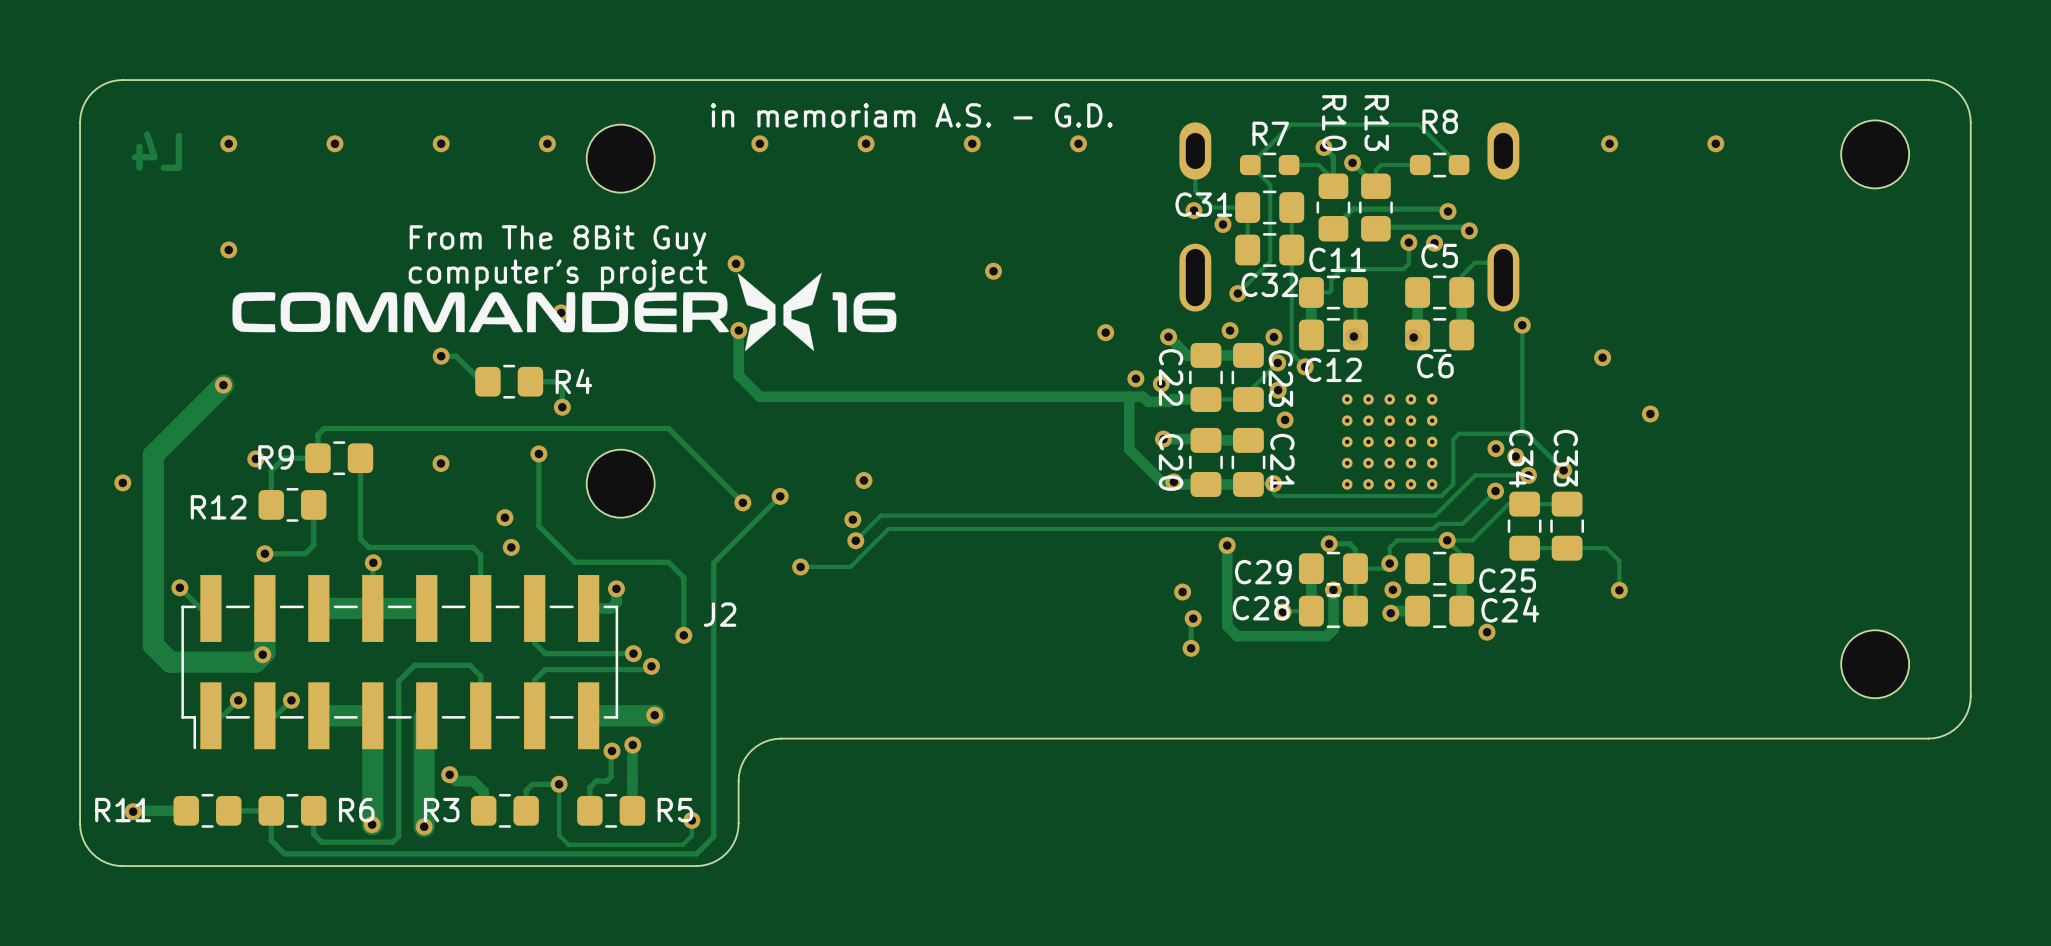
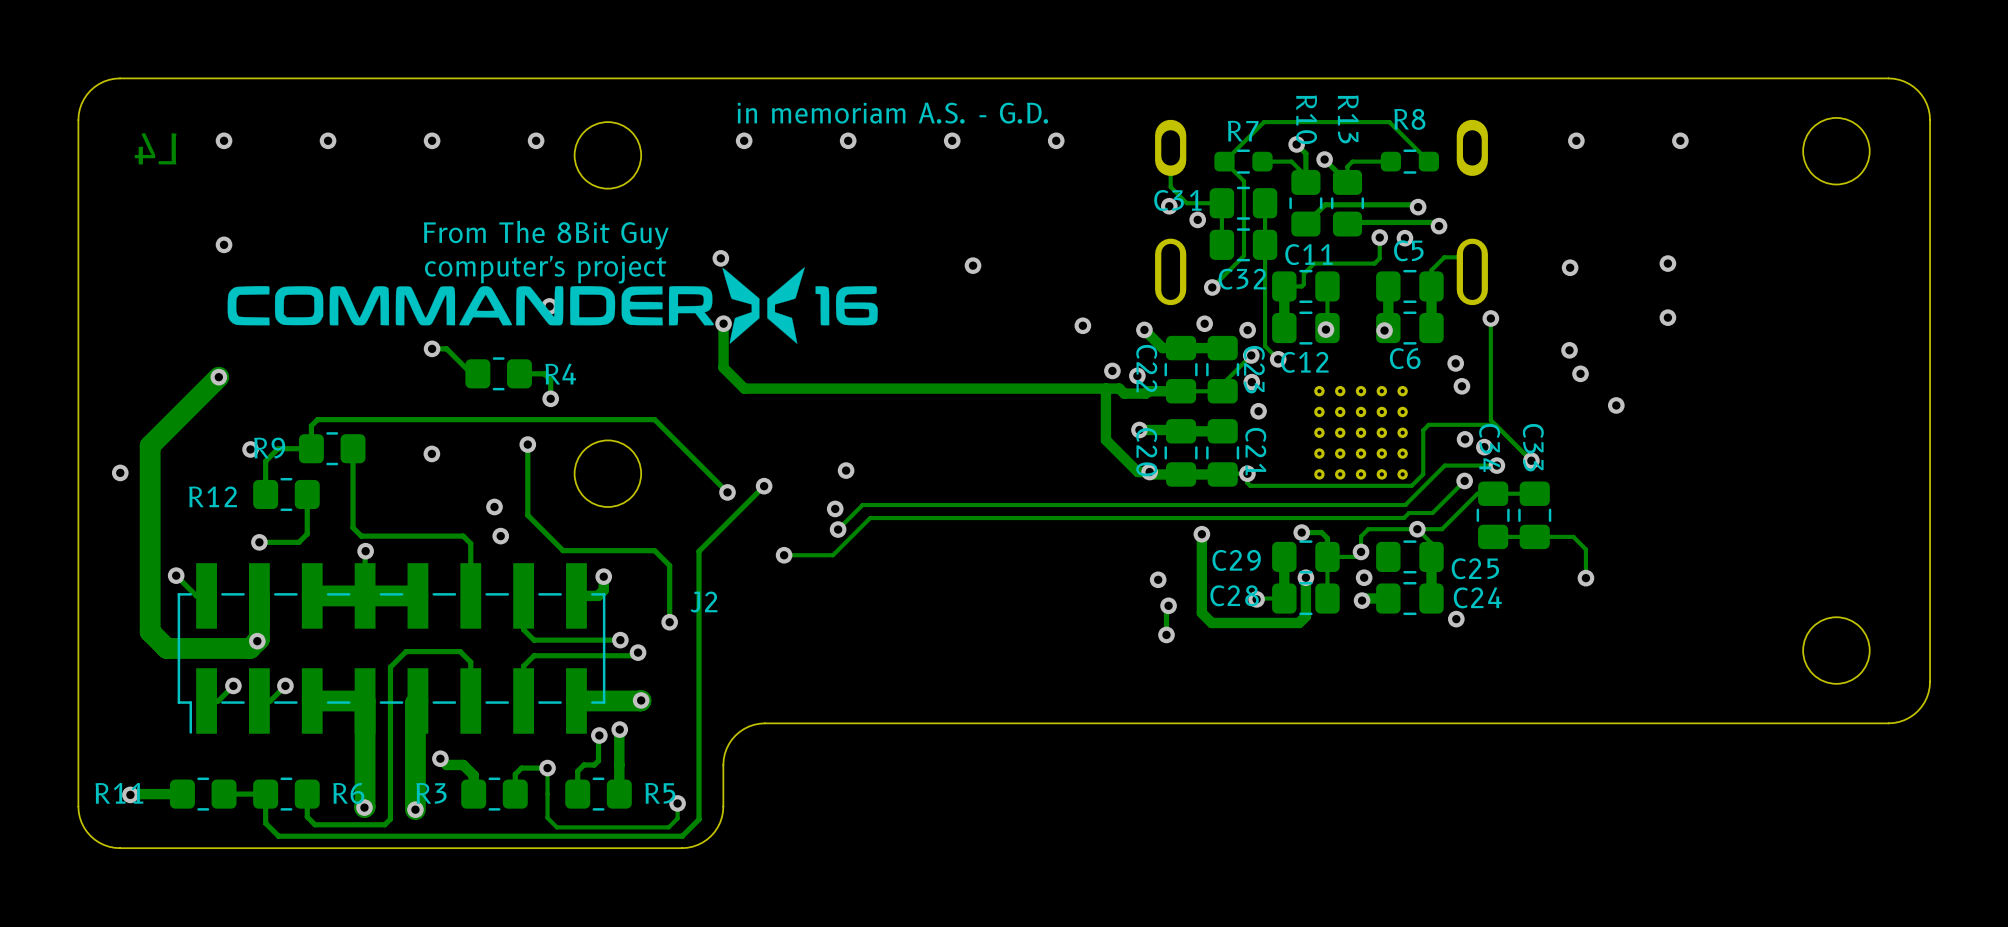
via: none -> (1667, 263)
via: none -> (1570, 267)
via: none -> (1667, 317)
via: none -> (1455, 363)
via: none -> (1580, 373)
via: none -> (1461, 386)

